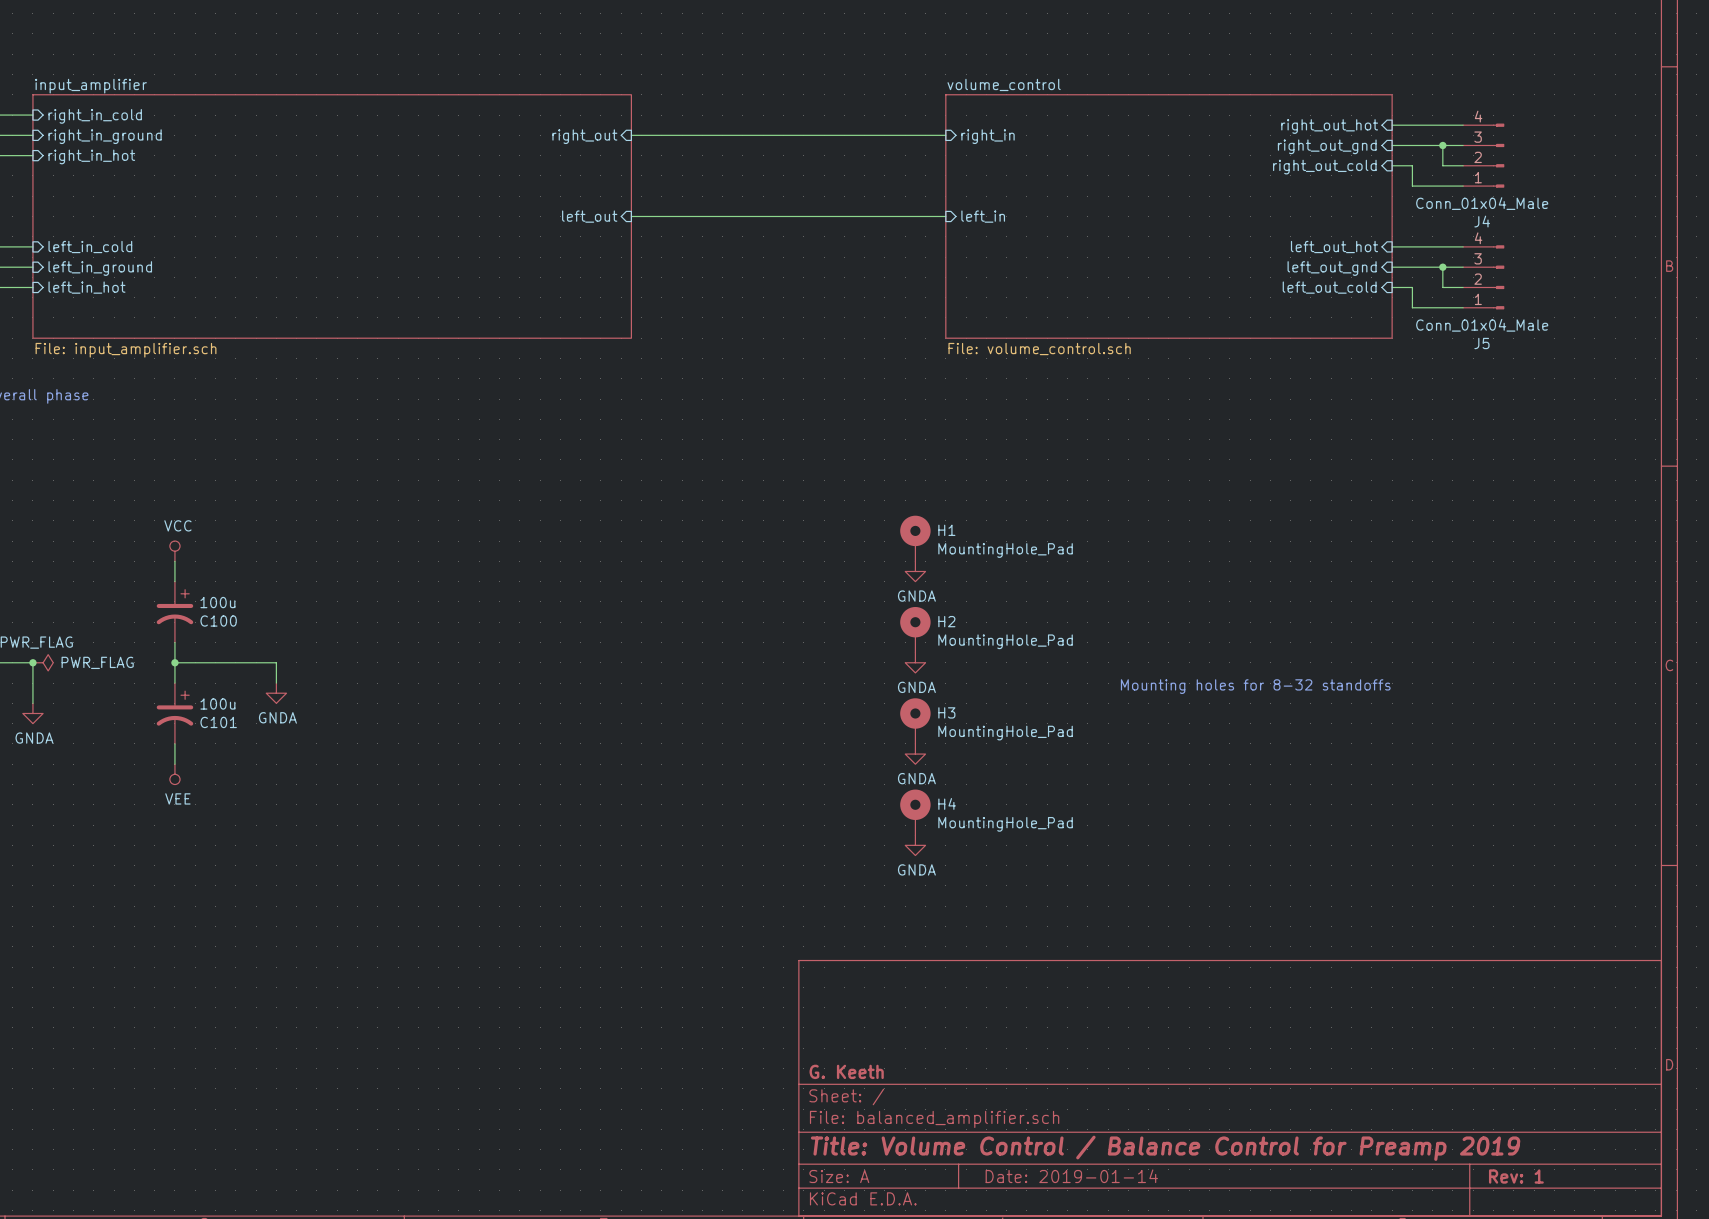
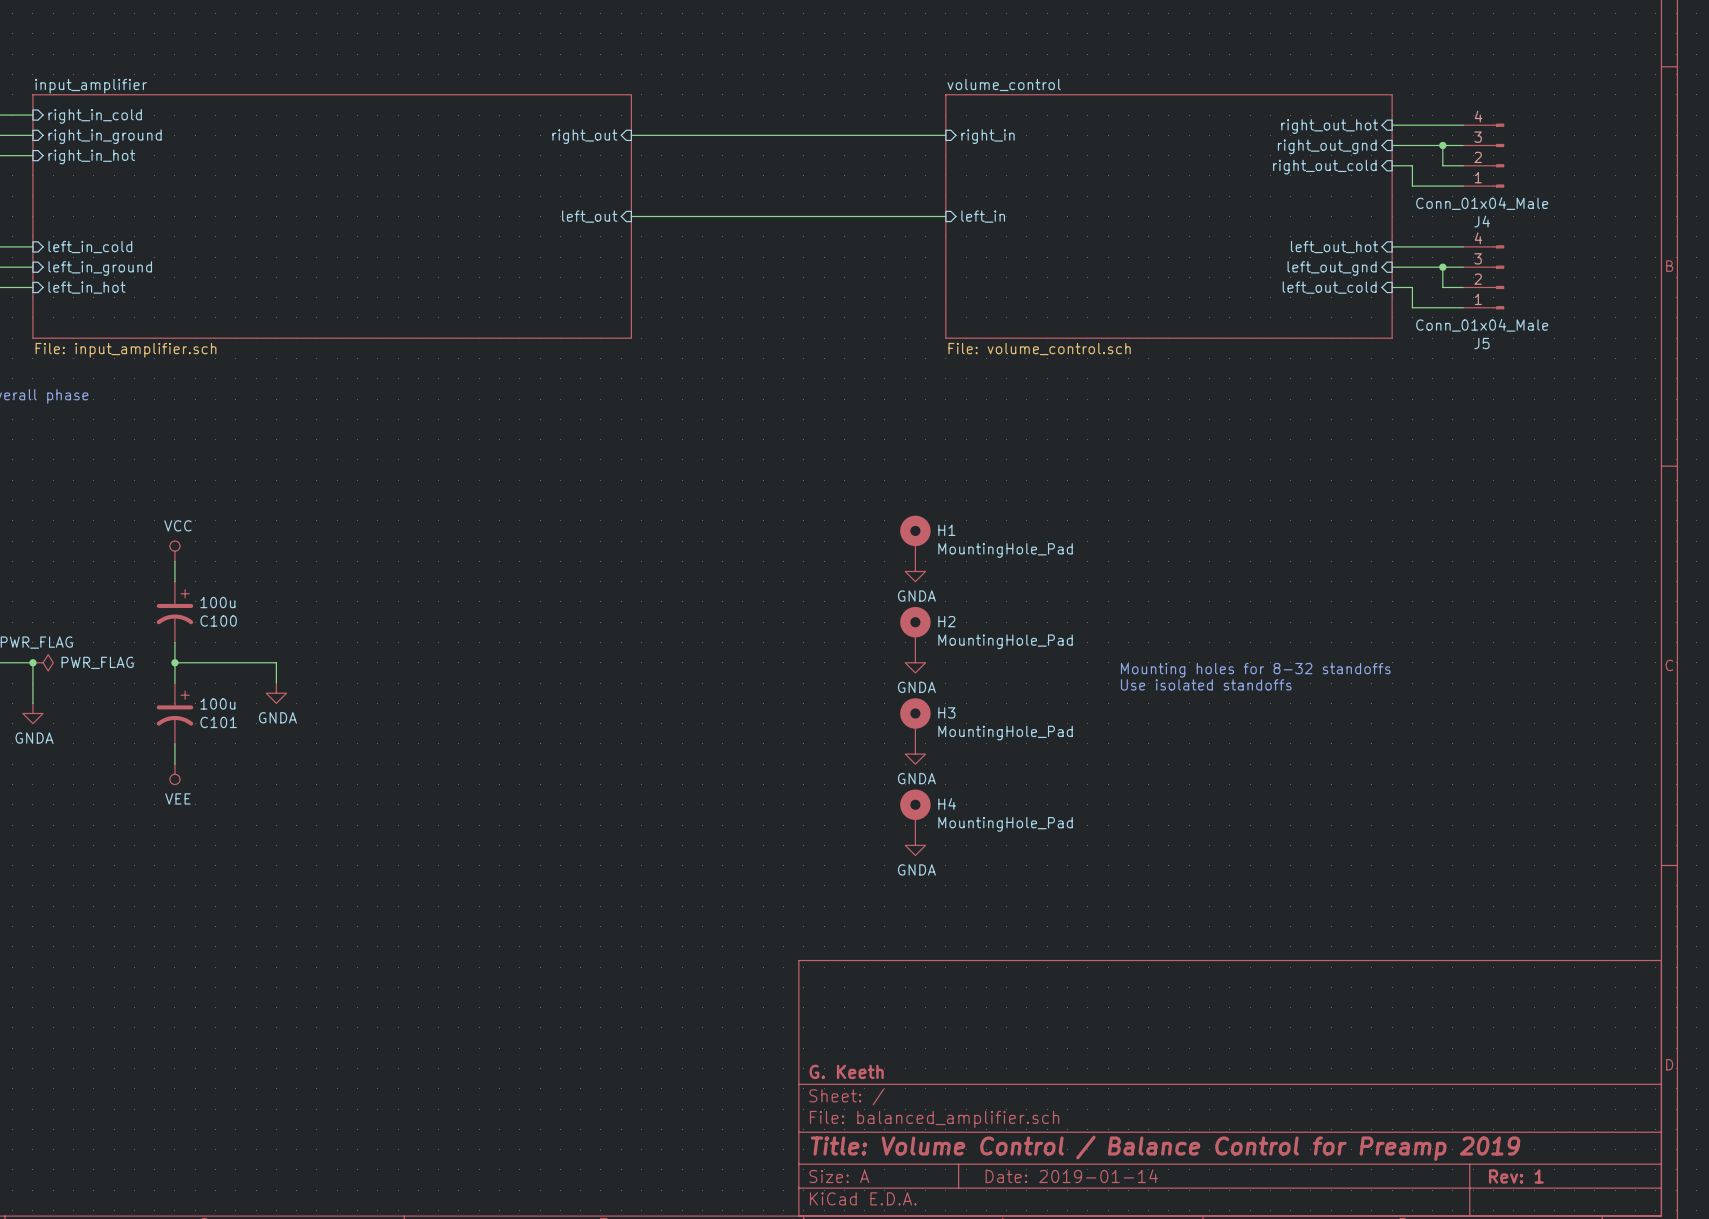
text: none -> Mounting holes for 8-32 standoffs (1255, 670)
text: Mounting holes for 8-32 standoffs (1255, 686) -> Use isolated standoffs (1206, 684)

